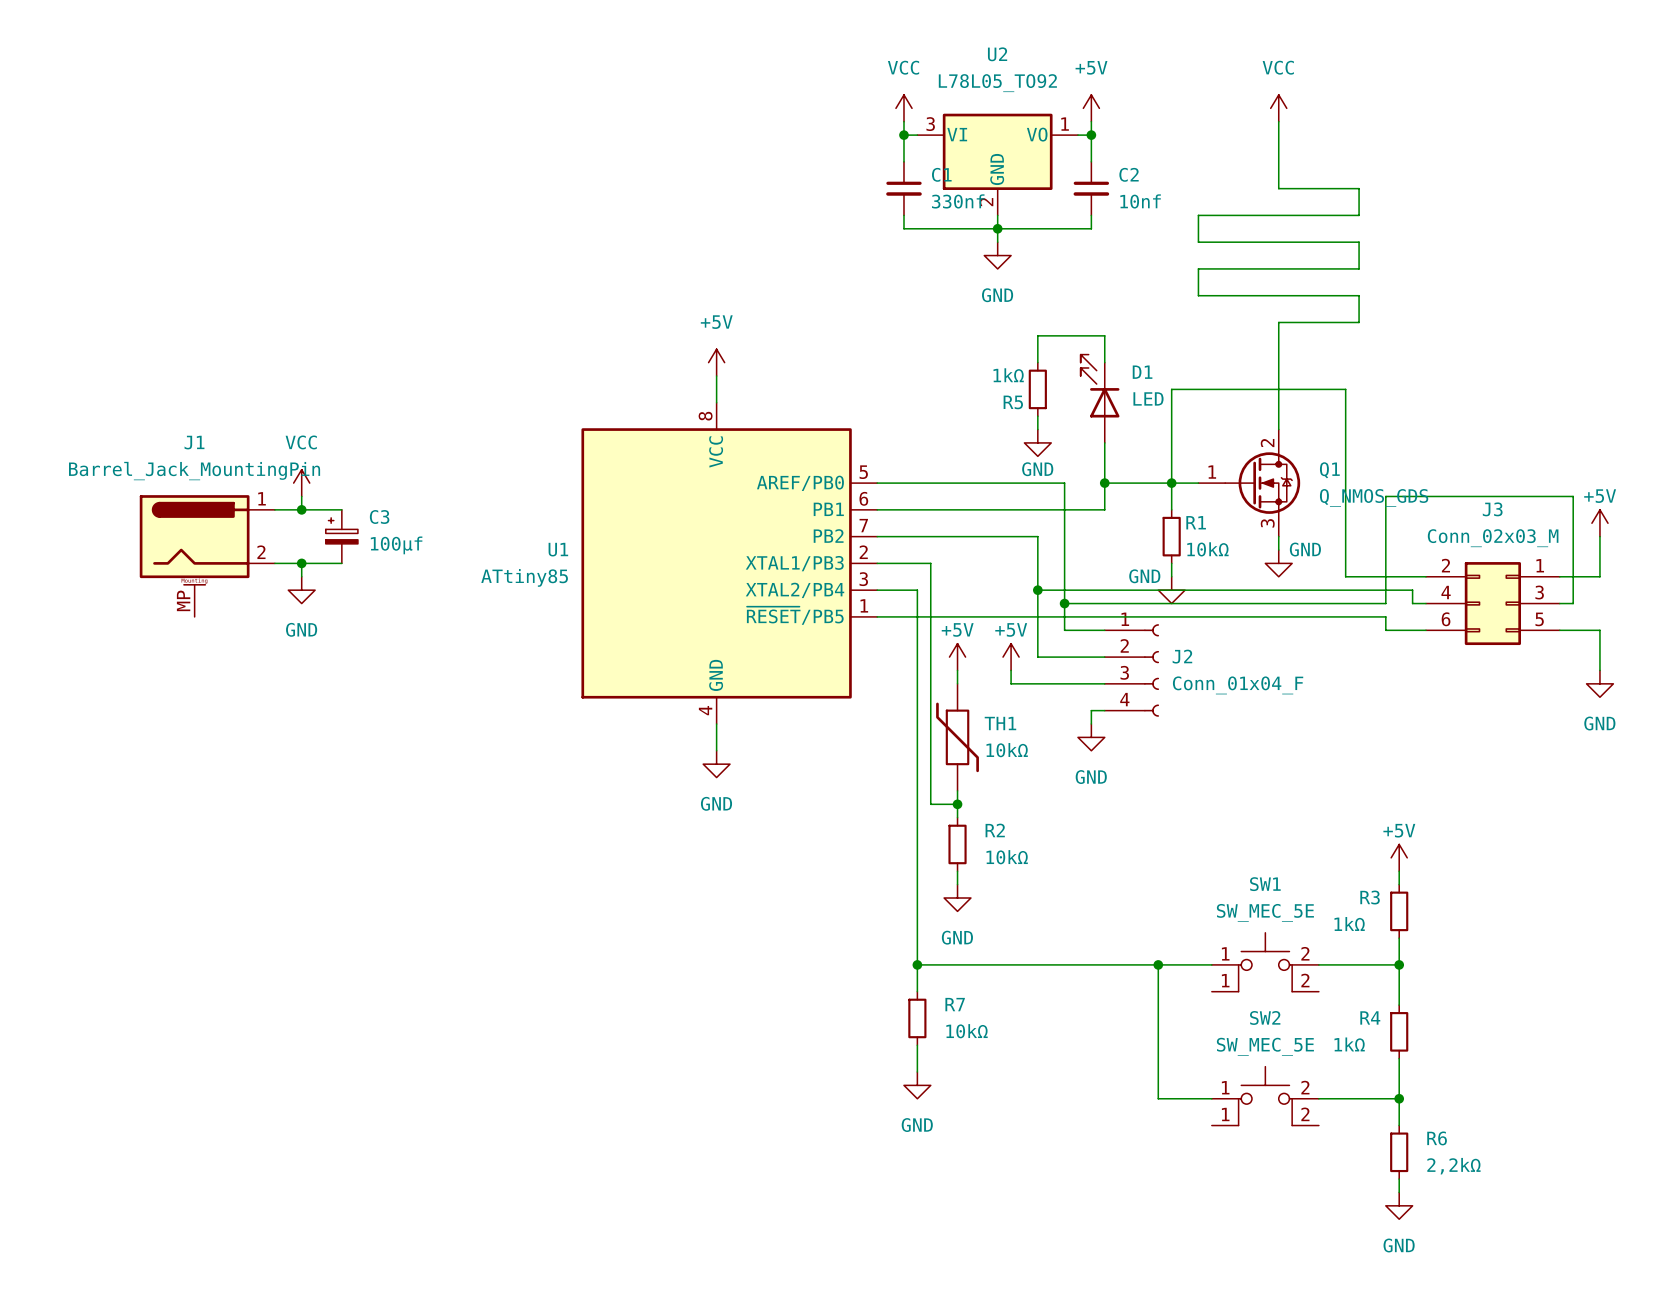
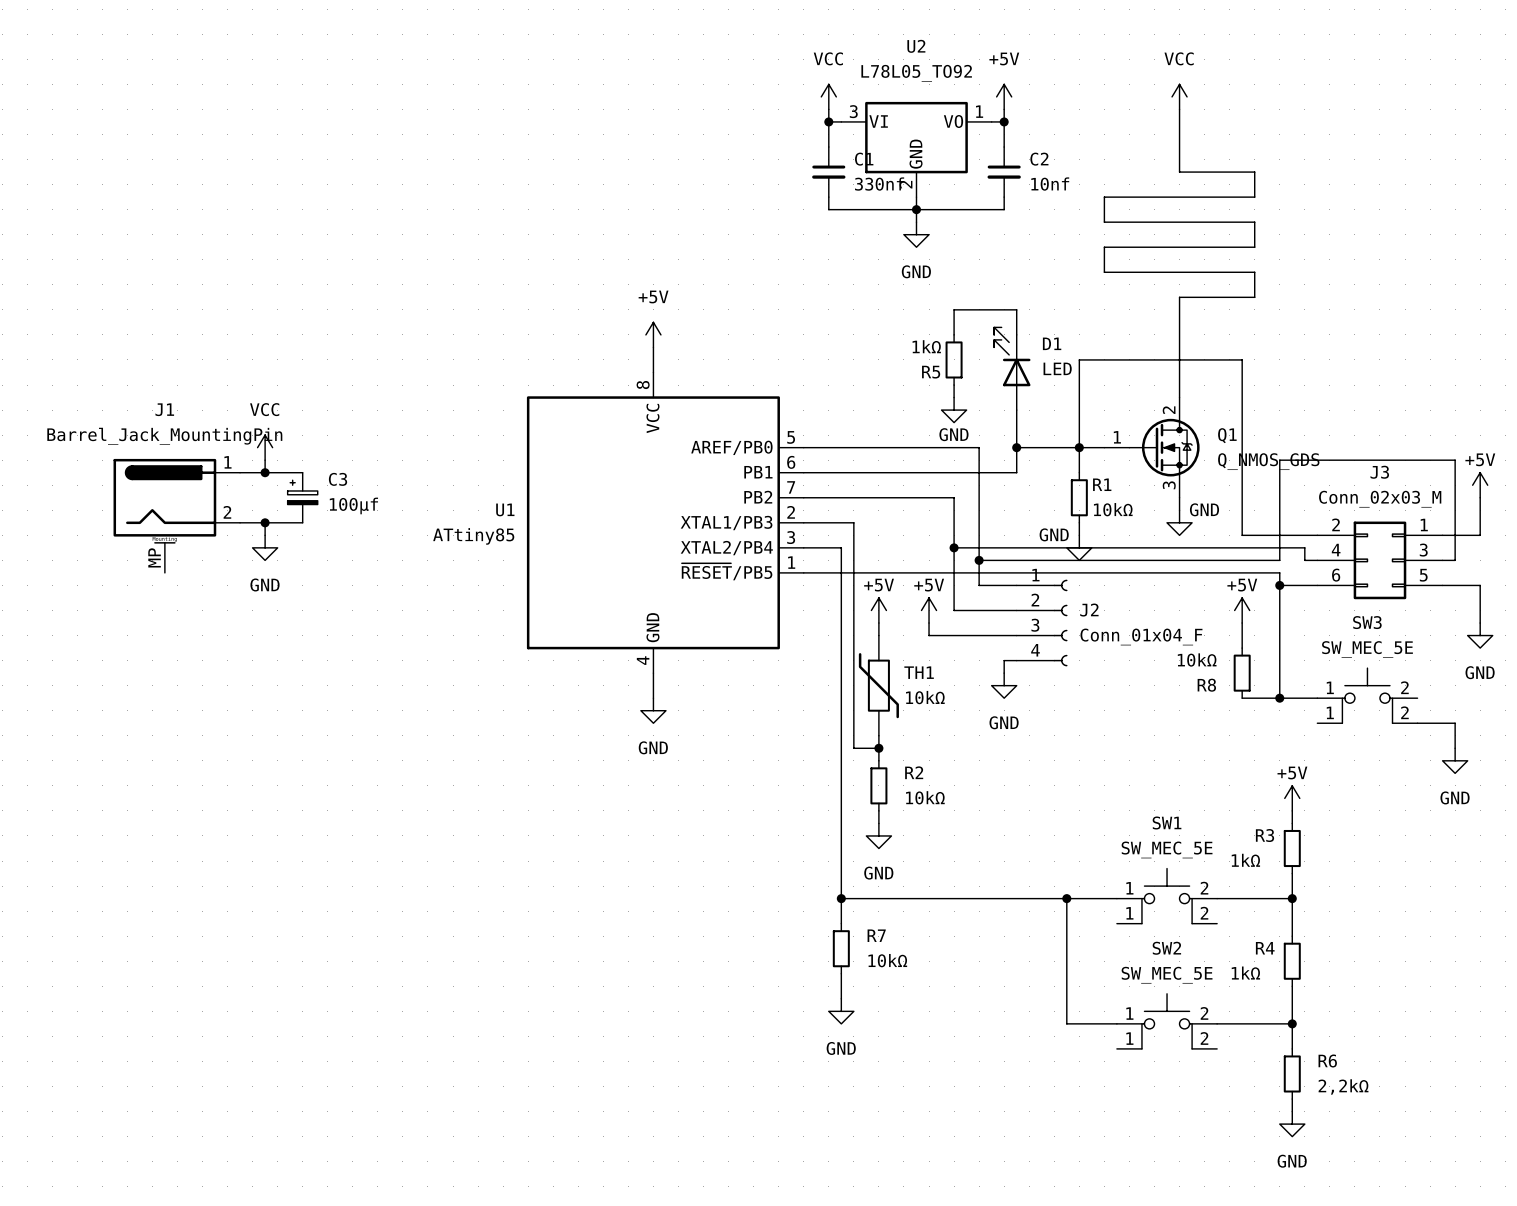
wire: none -> (1279, 585) (1279, 698)
junction: none -> (1279, 585)
power symbol: none -> +5V (1242, 610)
wire: none -> (1242, 623) (1242, 648)
R8: none -> 10kΩ (1242, 673)
SW3: none -> SW_MEC_5E (1367, 695)
wire: none -> (1242, 698) (1317, 698)
junction: none -> (1279, 698)
wire: none -> (1417, 723) (1455, 723) (1455, 748)
power symbol: none -> GND (1455, 760)

